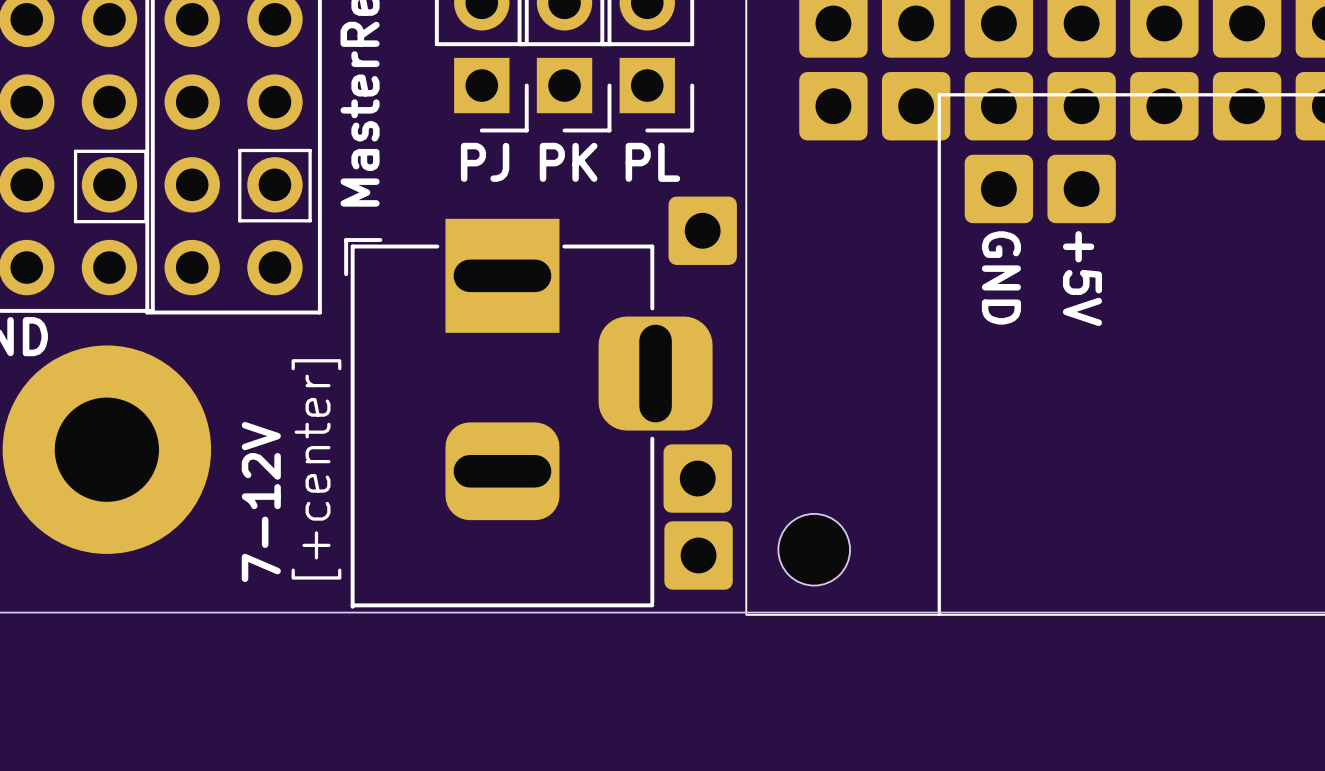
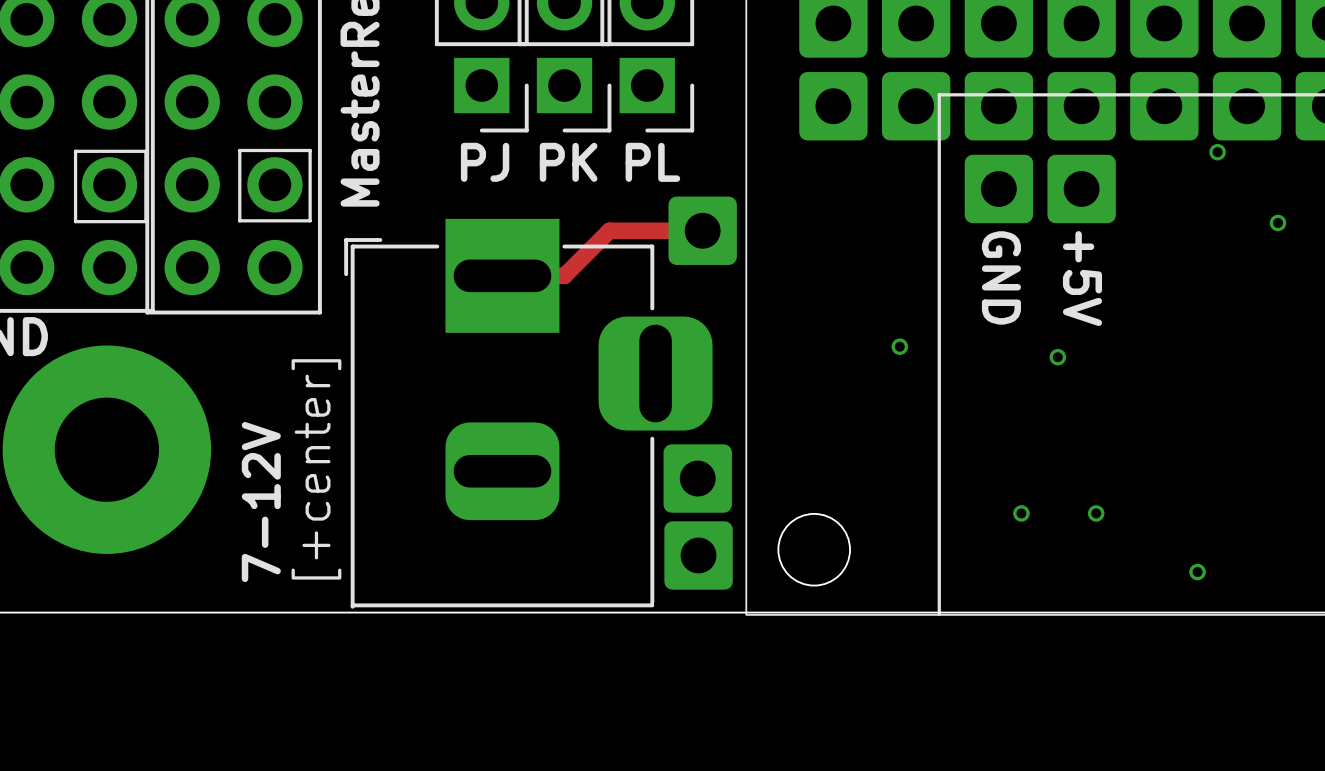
via: none -> (1217, 152)
via: none -> (1278, 222)
track: none -> (702, 230) (609, 230) (564, 275) (502, 275)
via: none -> (899, 346)
via: none -> (1057, 357)
via: none -> (1021, 513)
via: none -> (1096, 513)
via: none -> (1197, 572)

